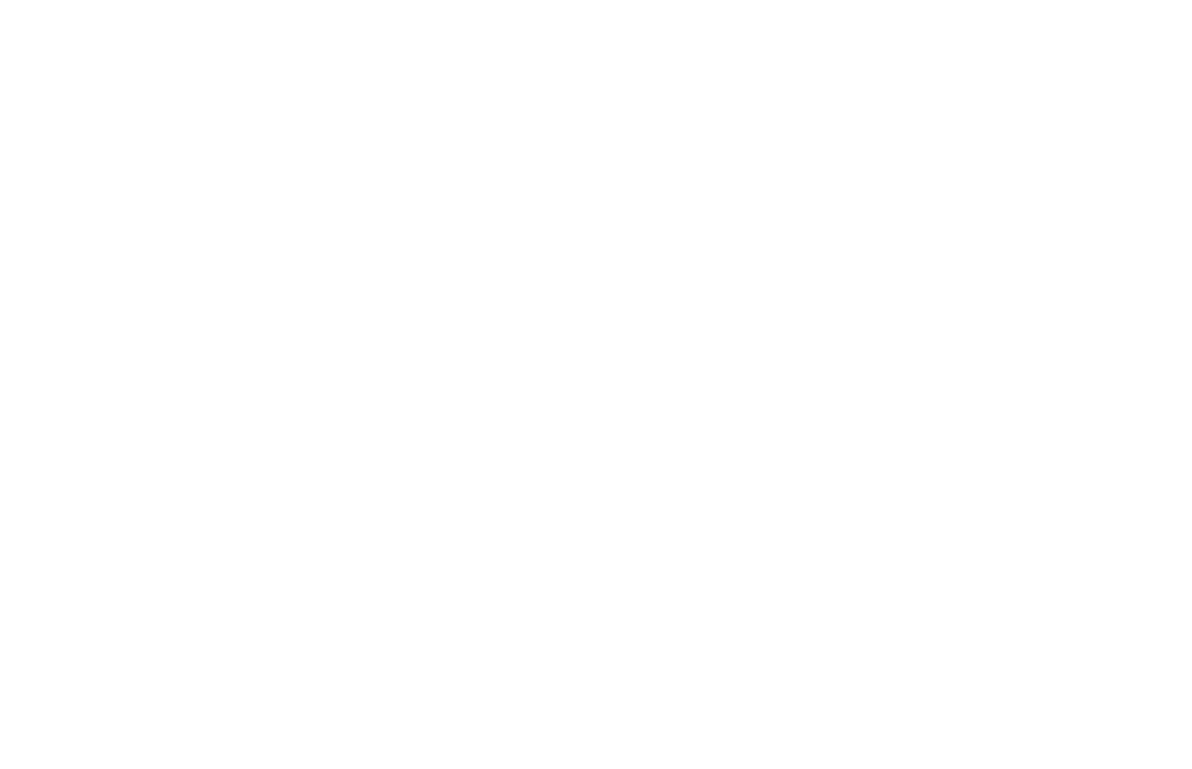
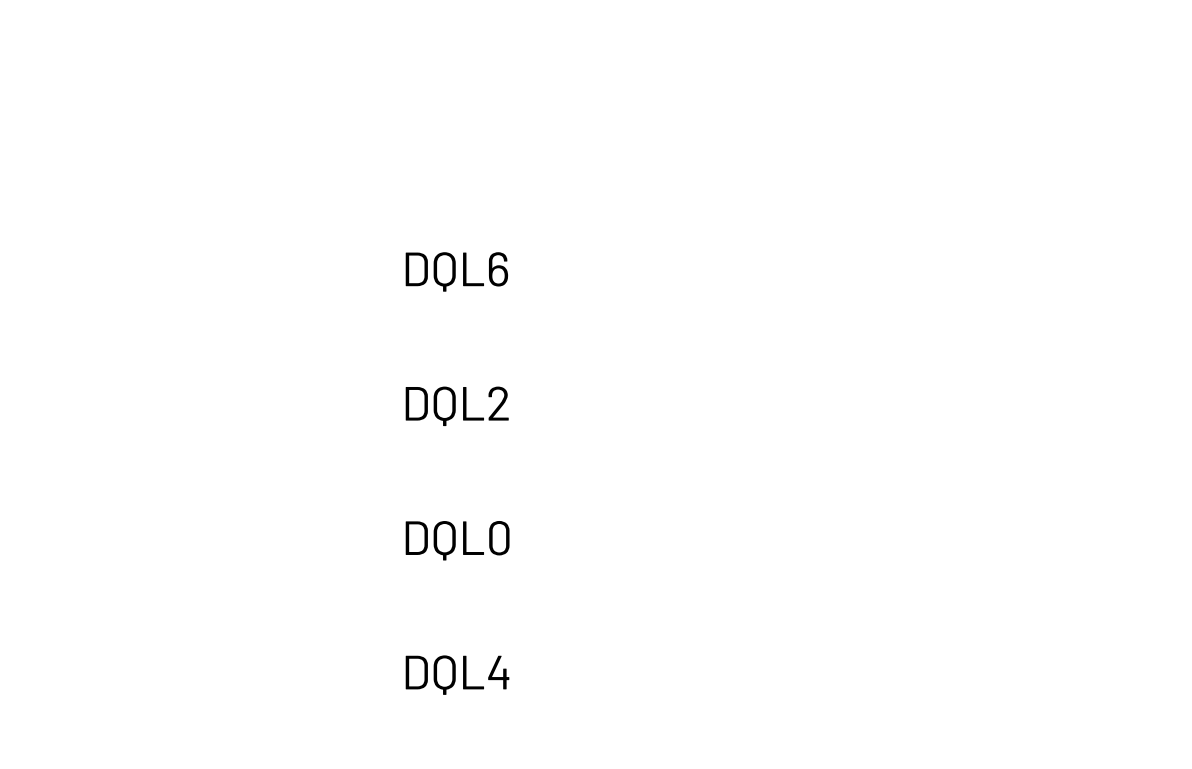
label: none -> DQL6 (456, 271)
label: none -> DQL2 (457, 406)
label: none -> DQL0 (457, 540)
label: none -> DQL4 (457, 675)

